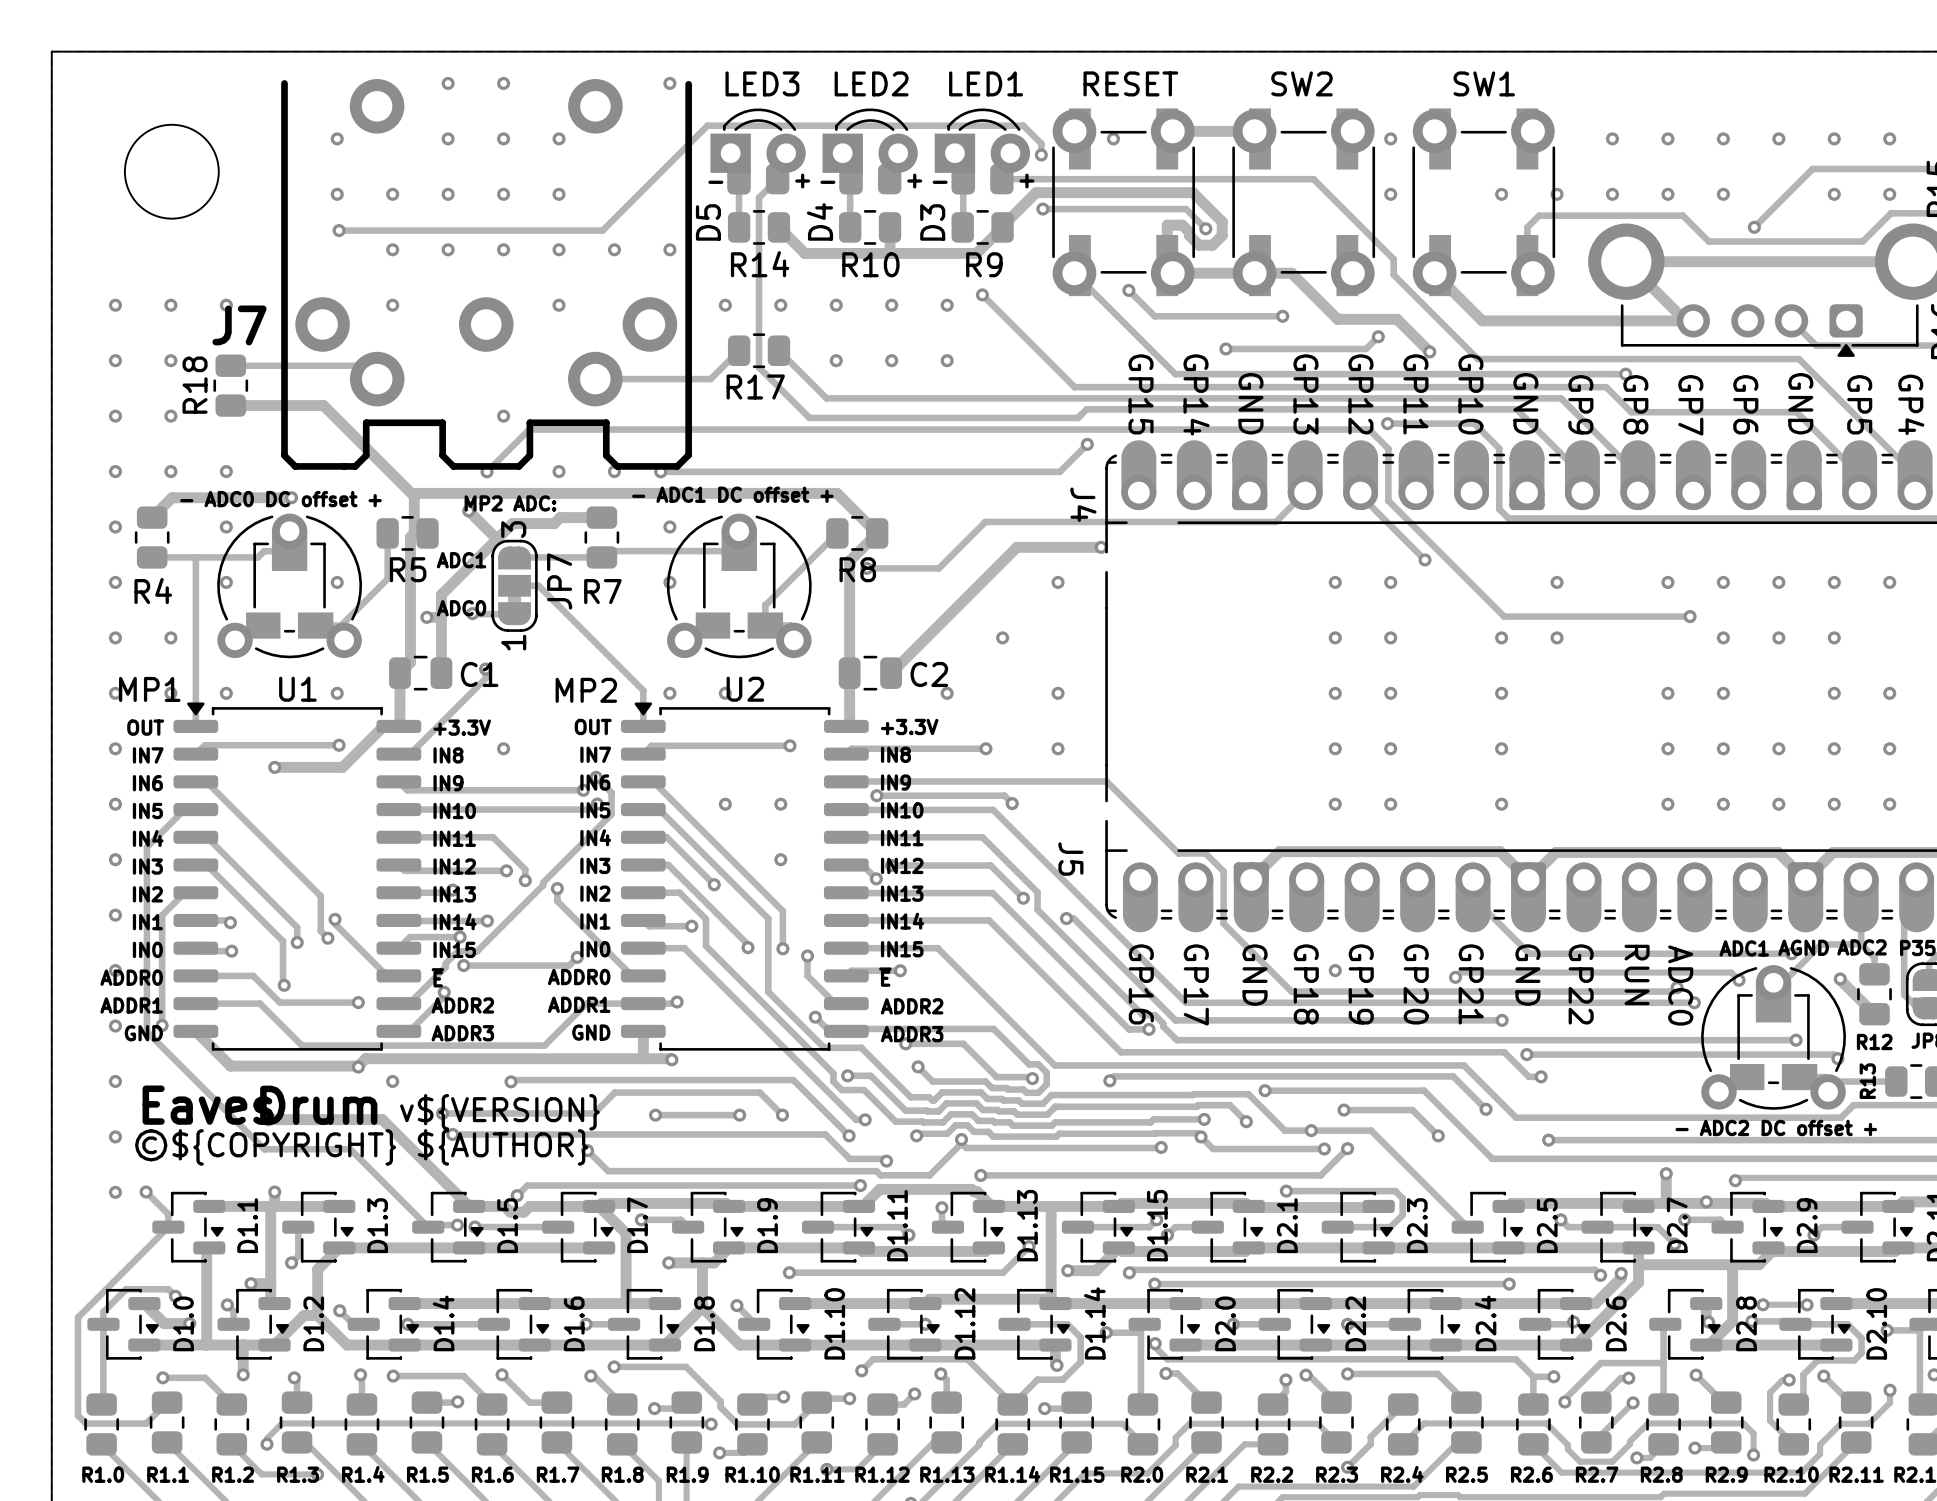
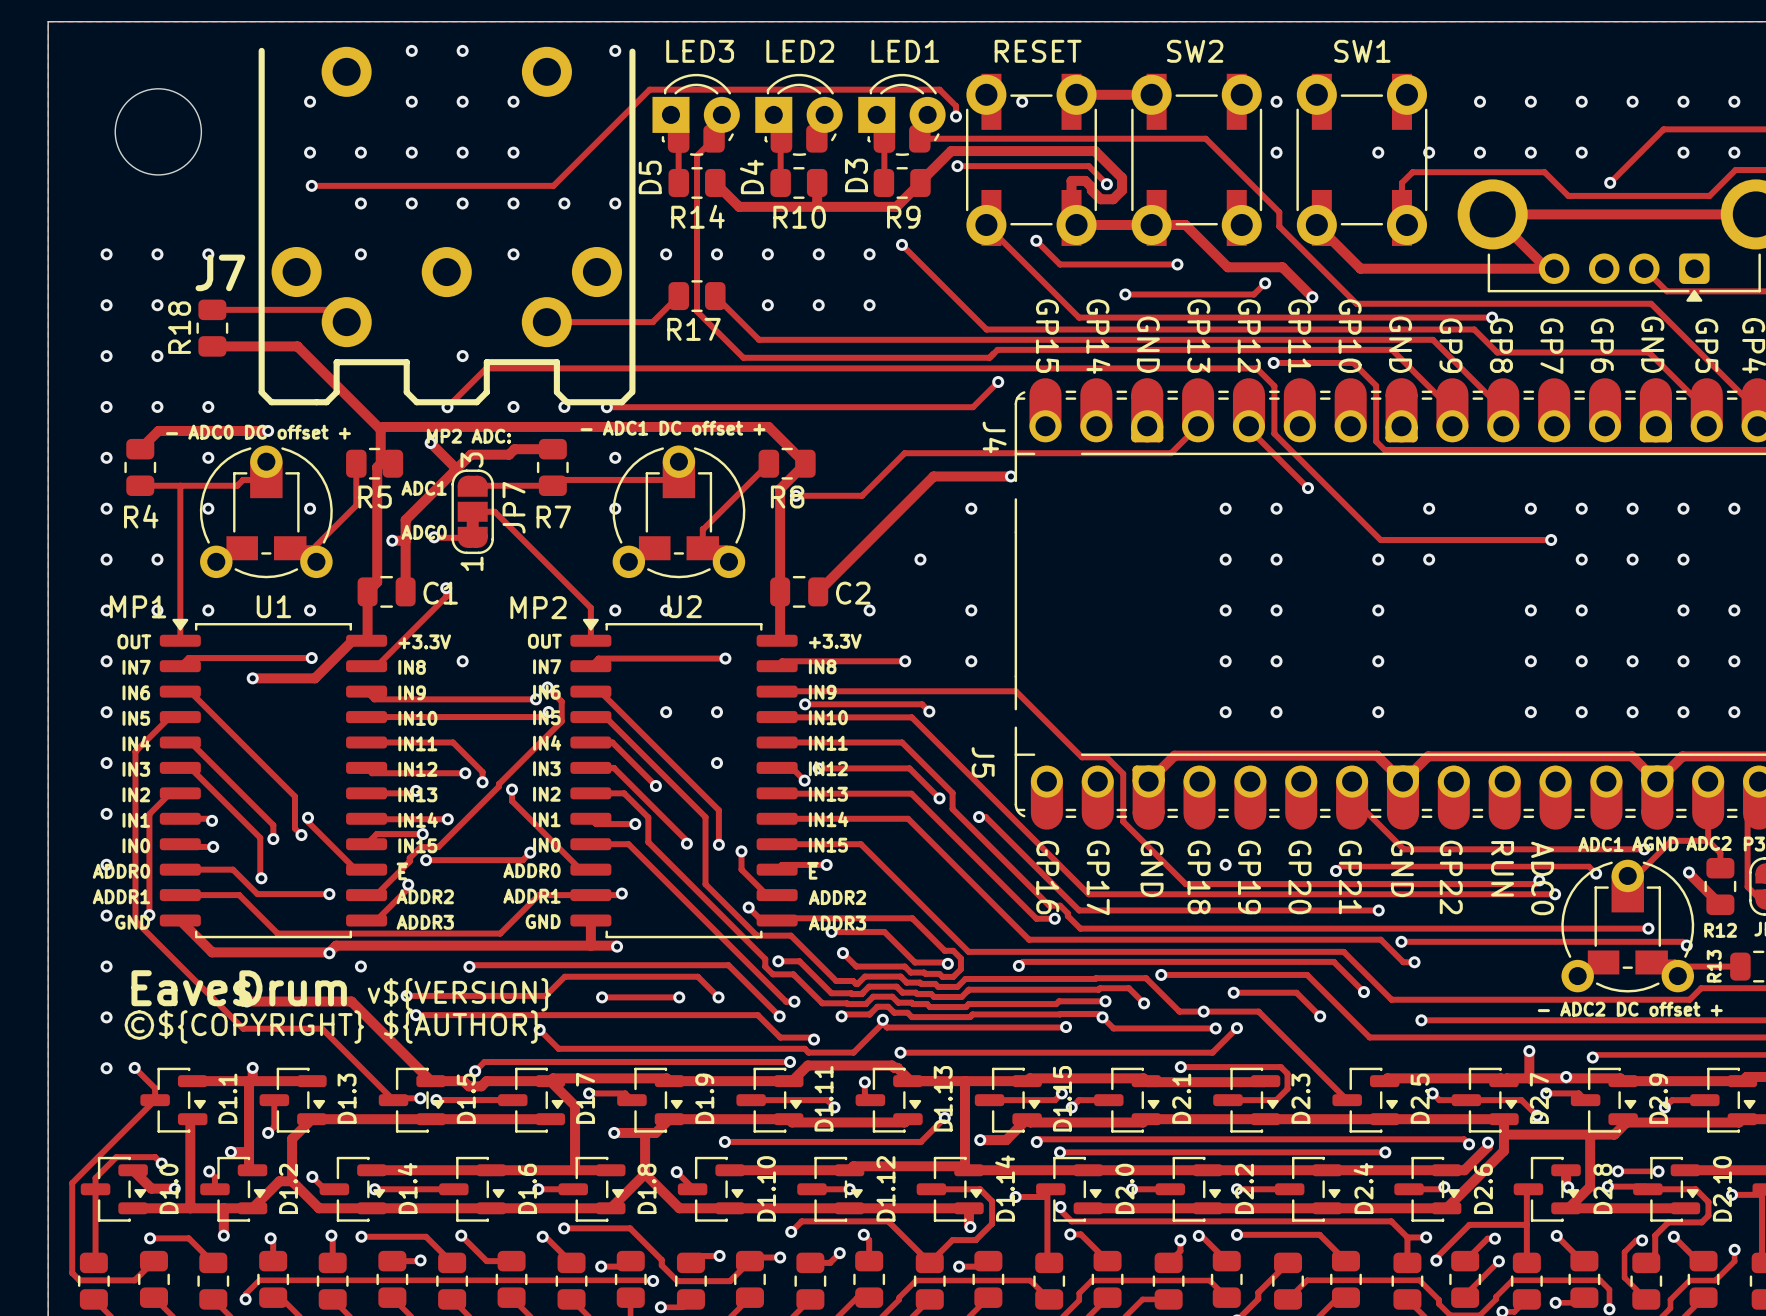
D5 footprint: [710, 108, 806, 195] -> [652, 73, 740, 156]
D4 footprint: [822, 108, 918, 195] -> [755, 73, 843, 156]
D3 footprint: [934, 108, 1031, 195] -> [858, 73, 946, 156]

